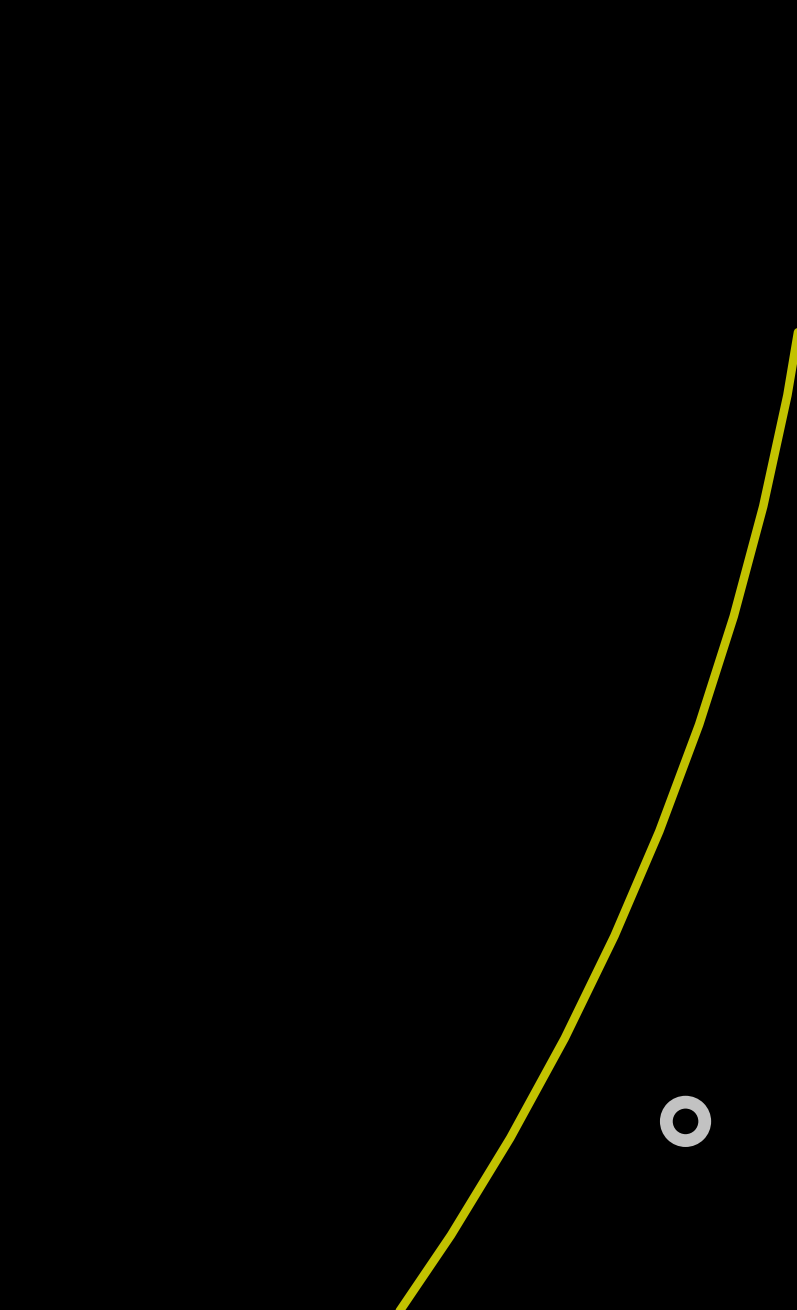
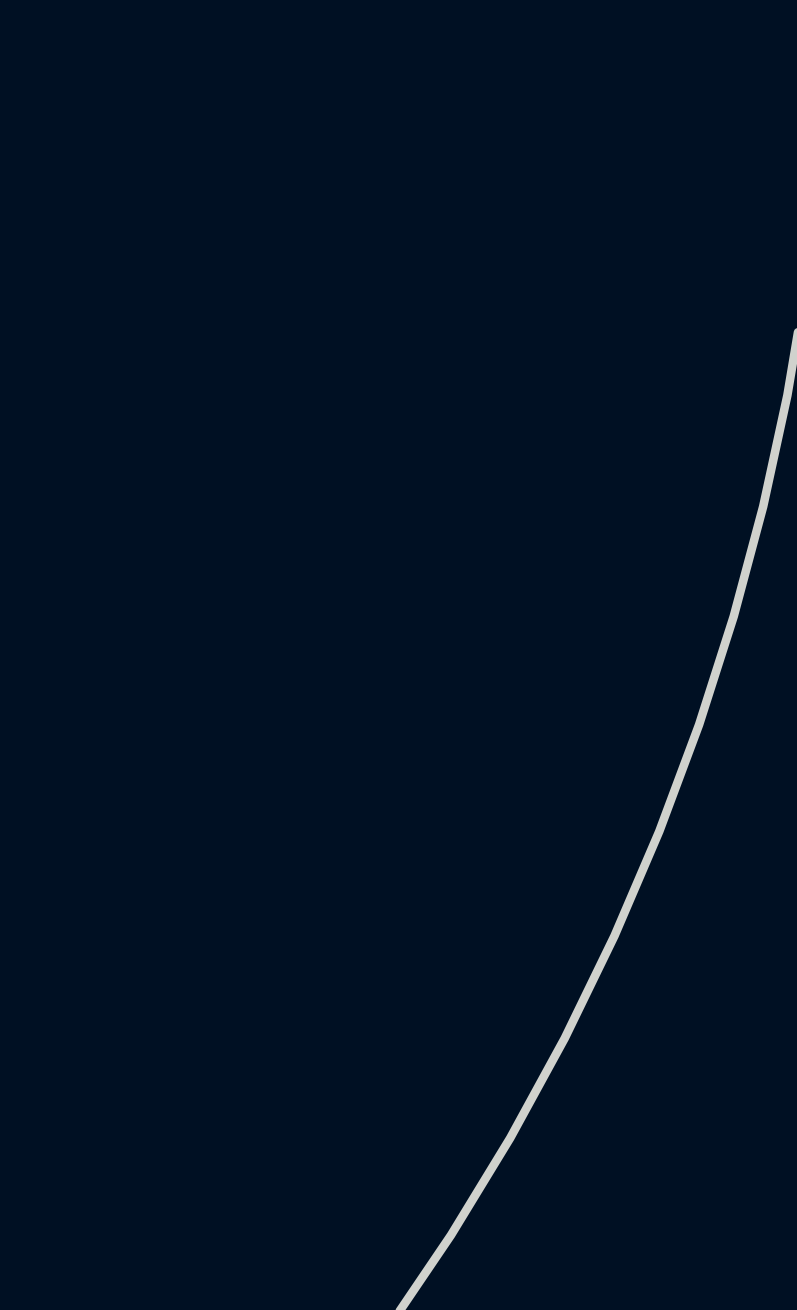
via: (685, 1121) -> none

